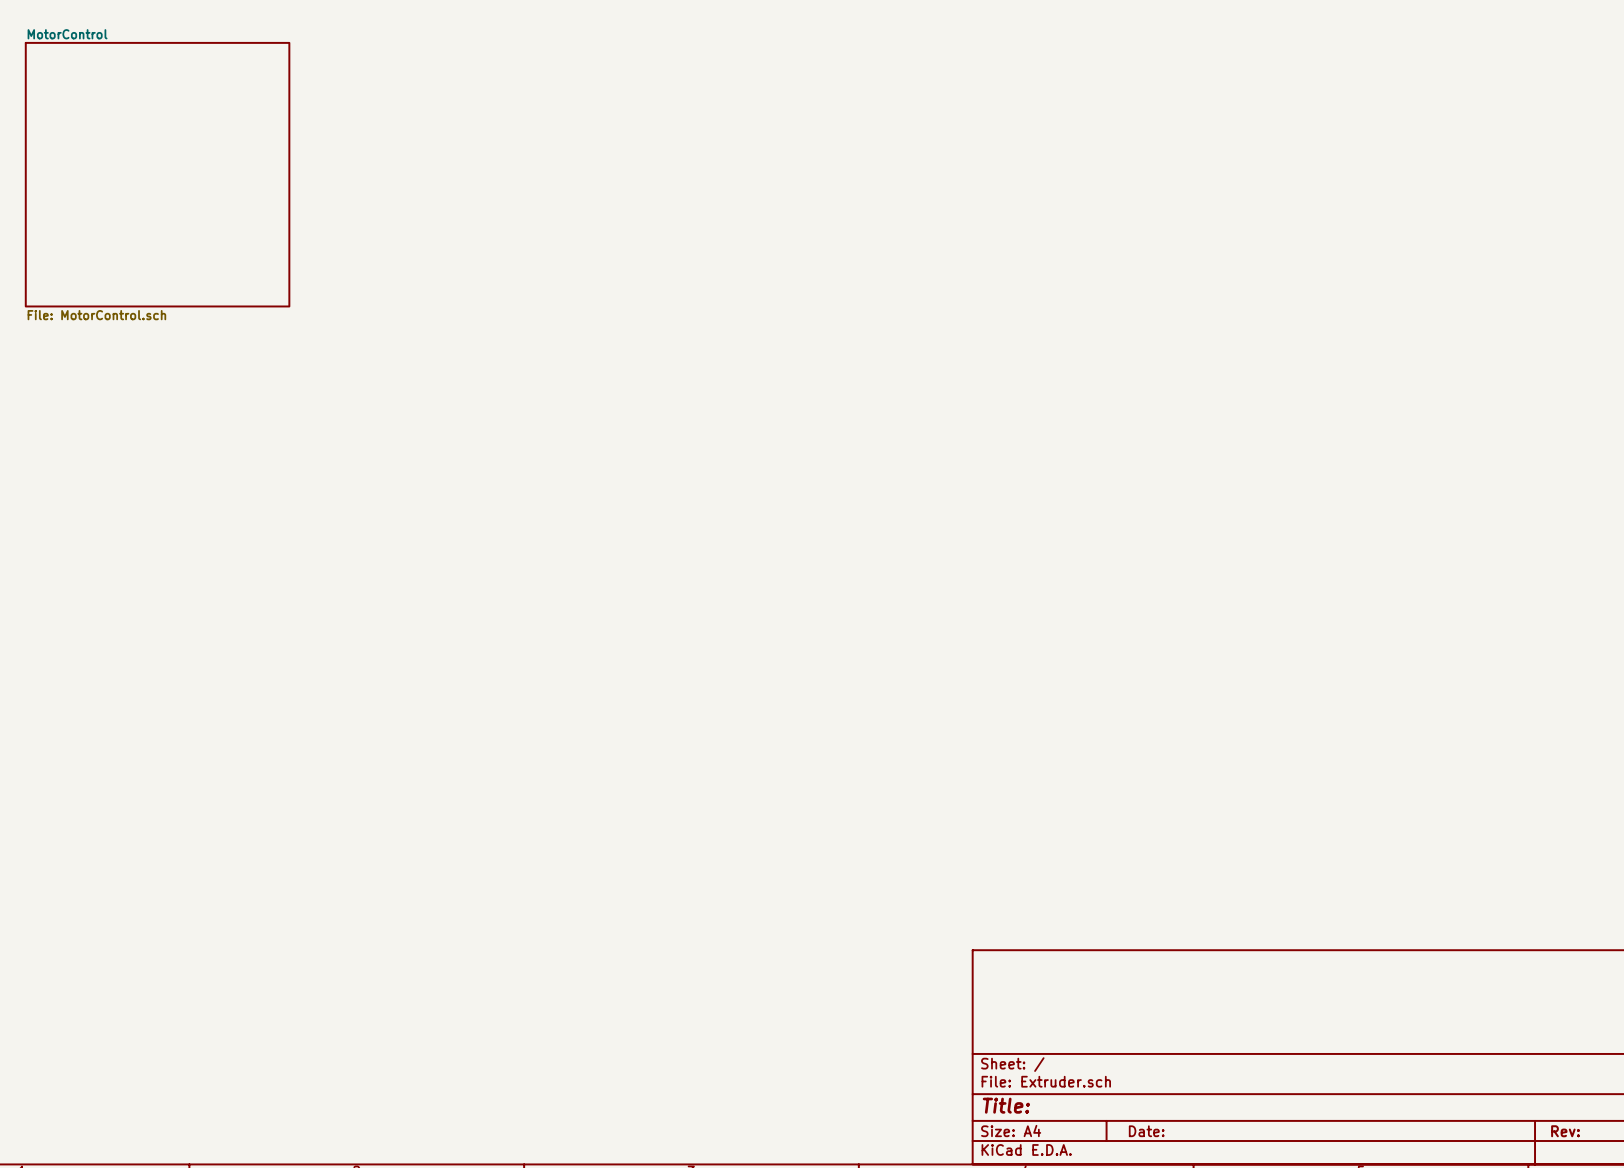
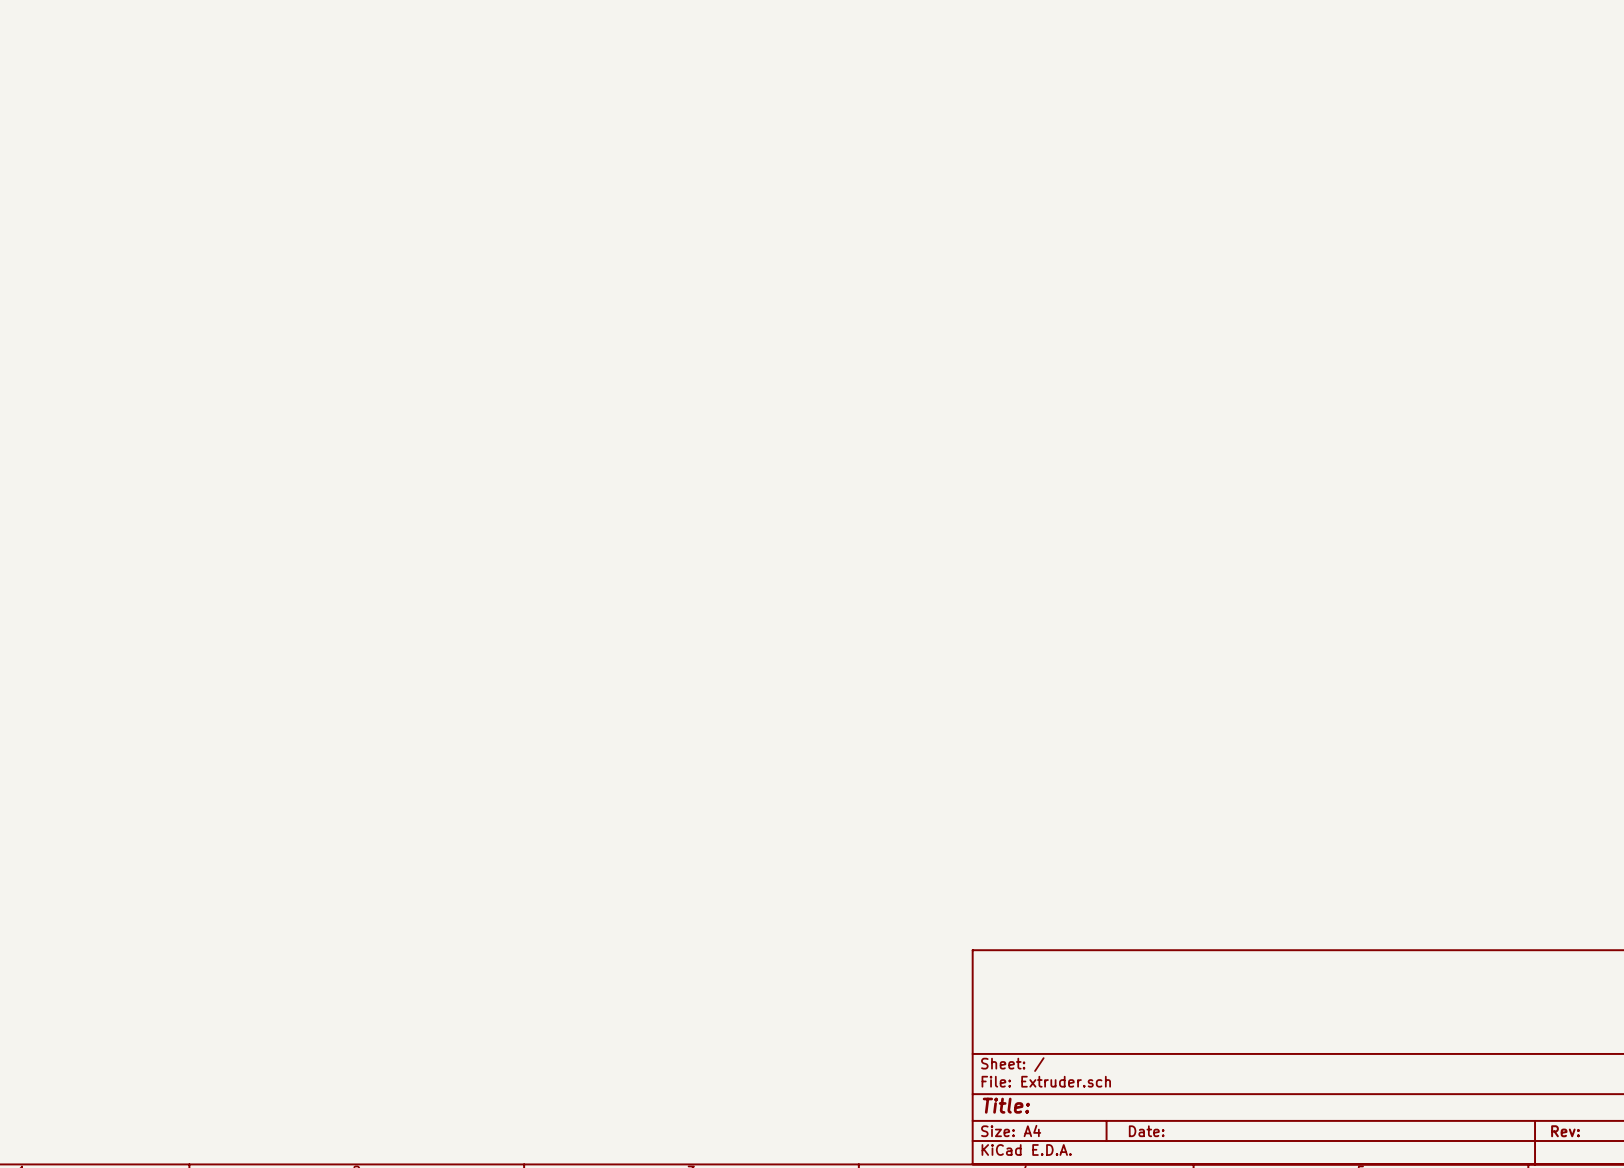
sheet MotorControl: File: MotorControl.sch (157, 174) -> none

